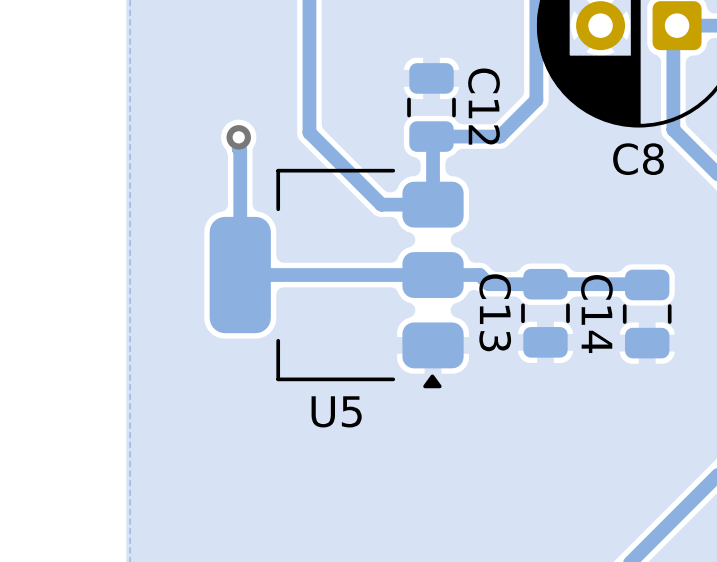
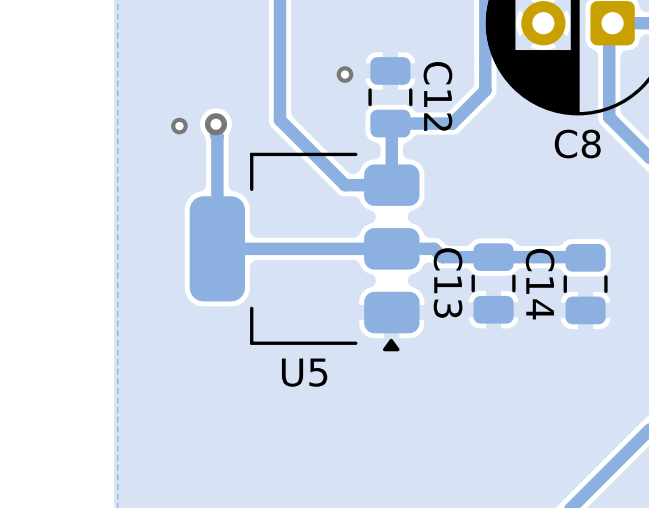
via: none -> (345, 74)
via: none -> (179, 126)

